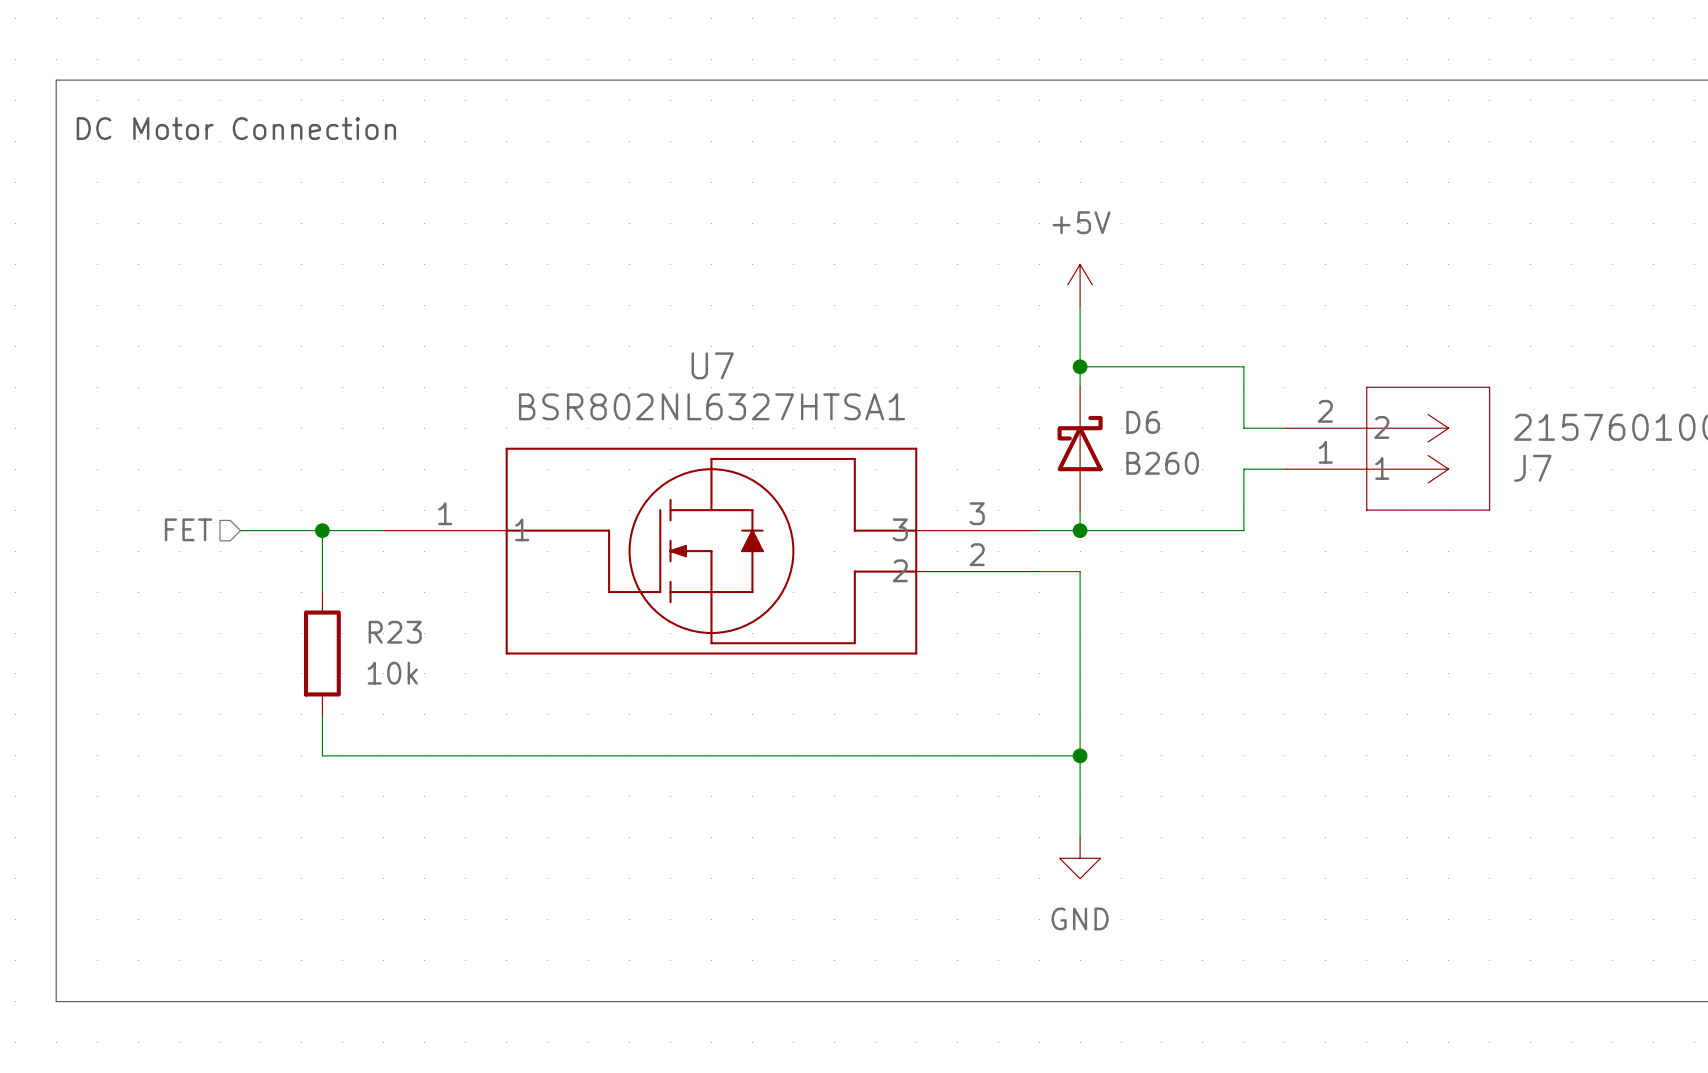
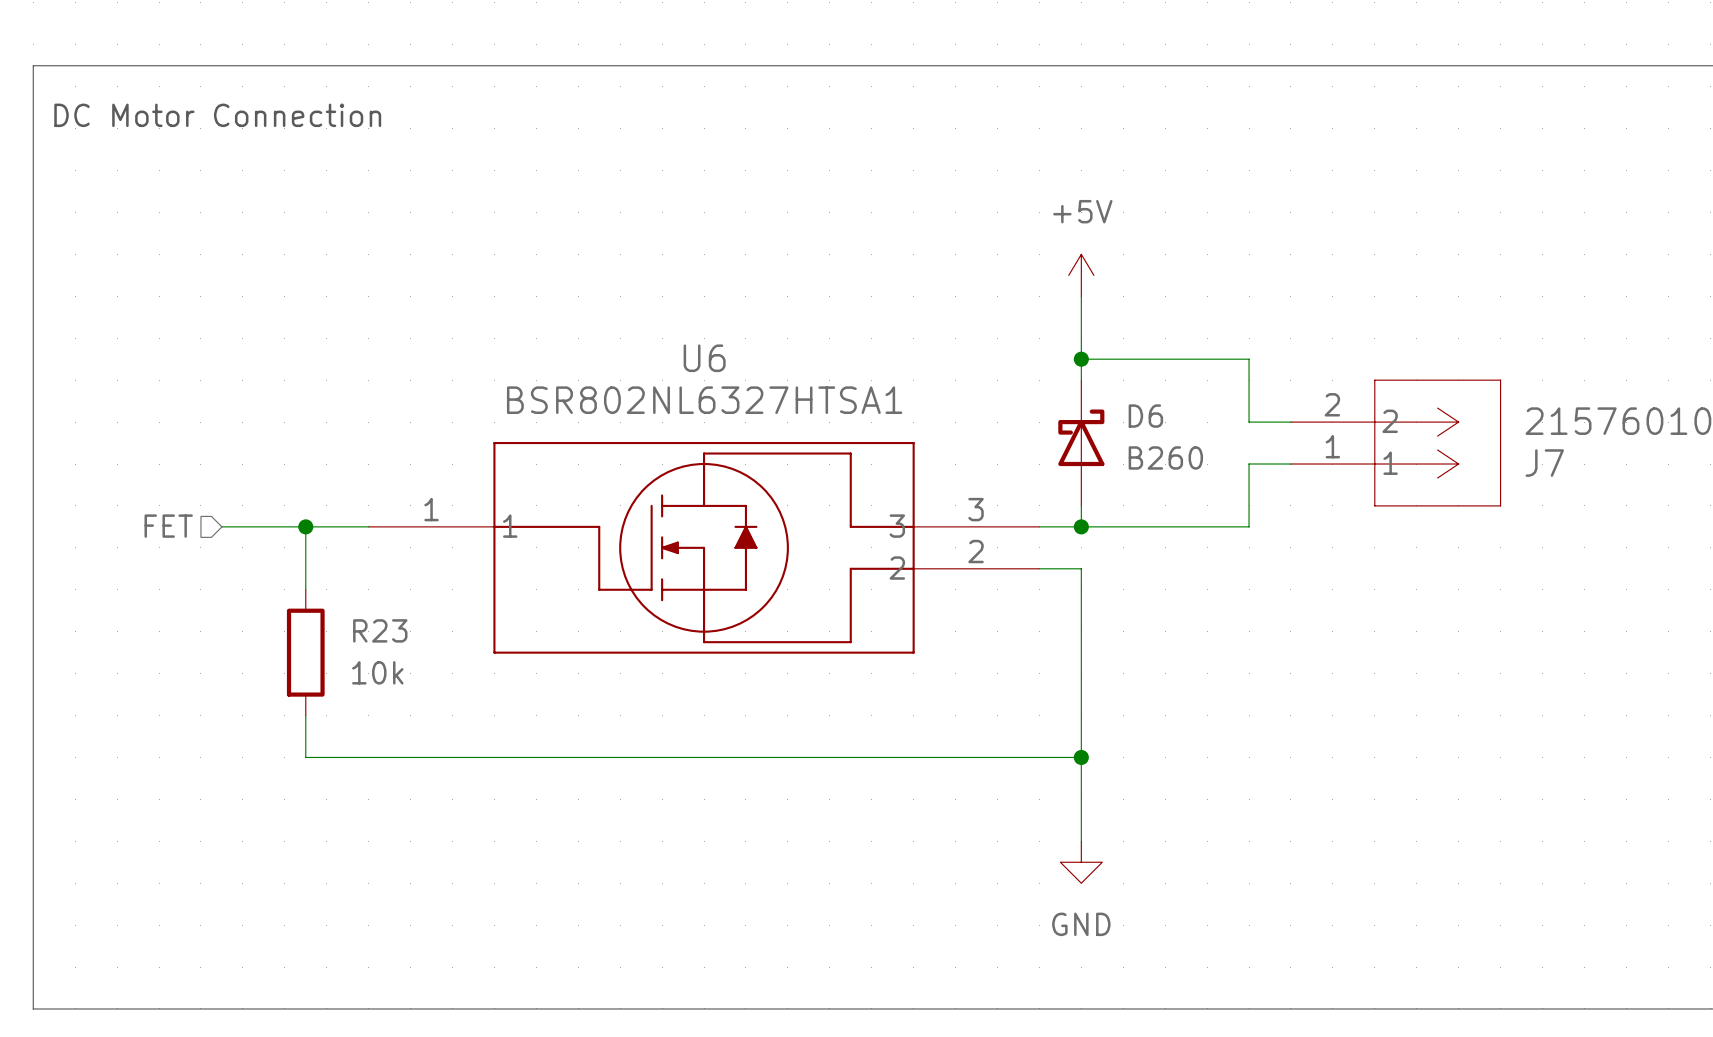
U7 name: U7 (712, 365) -> U6 (704, 358)

